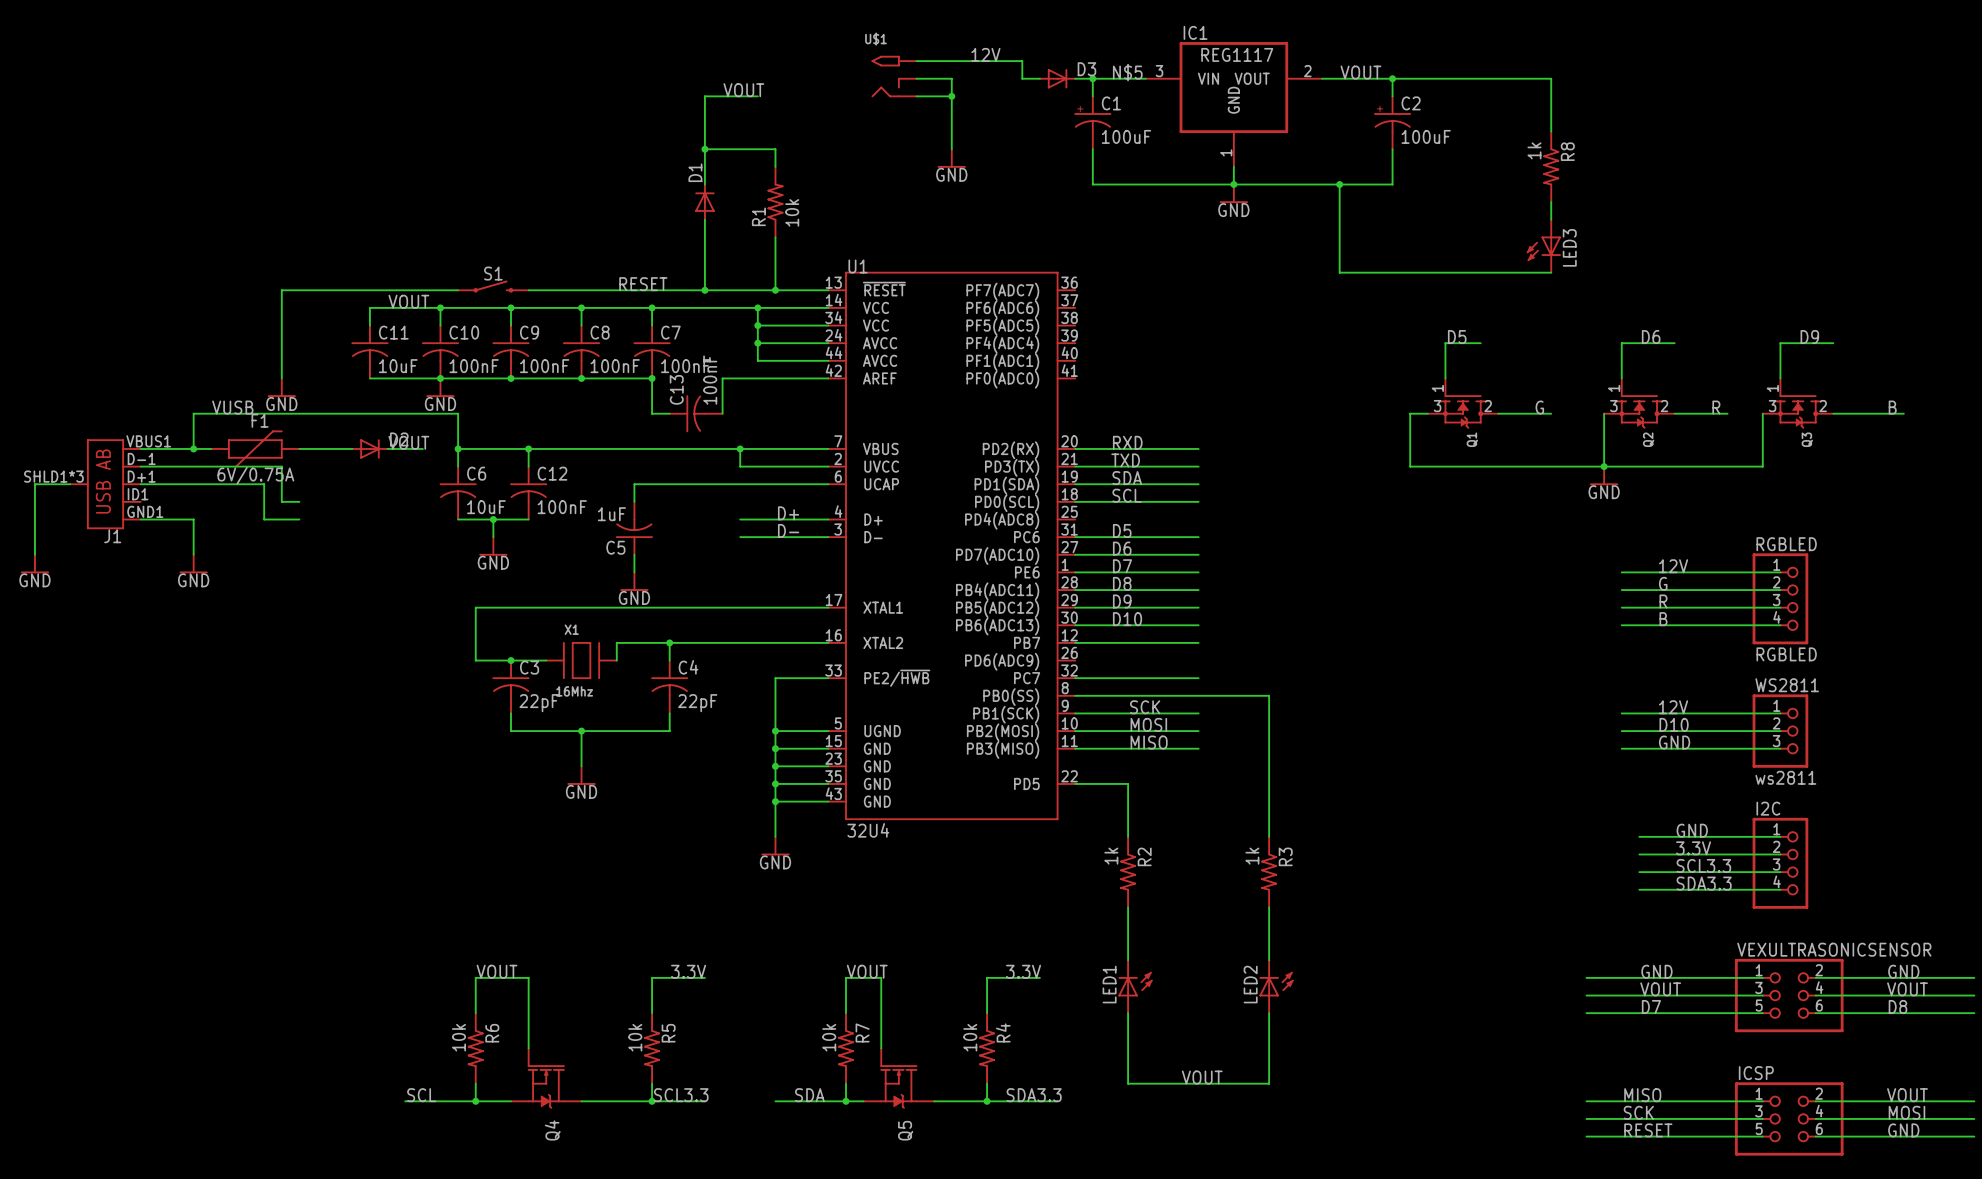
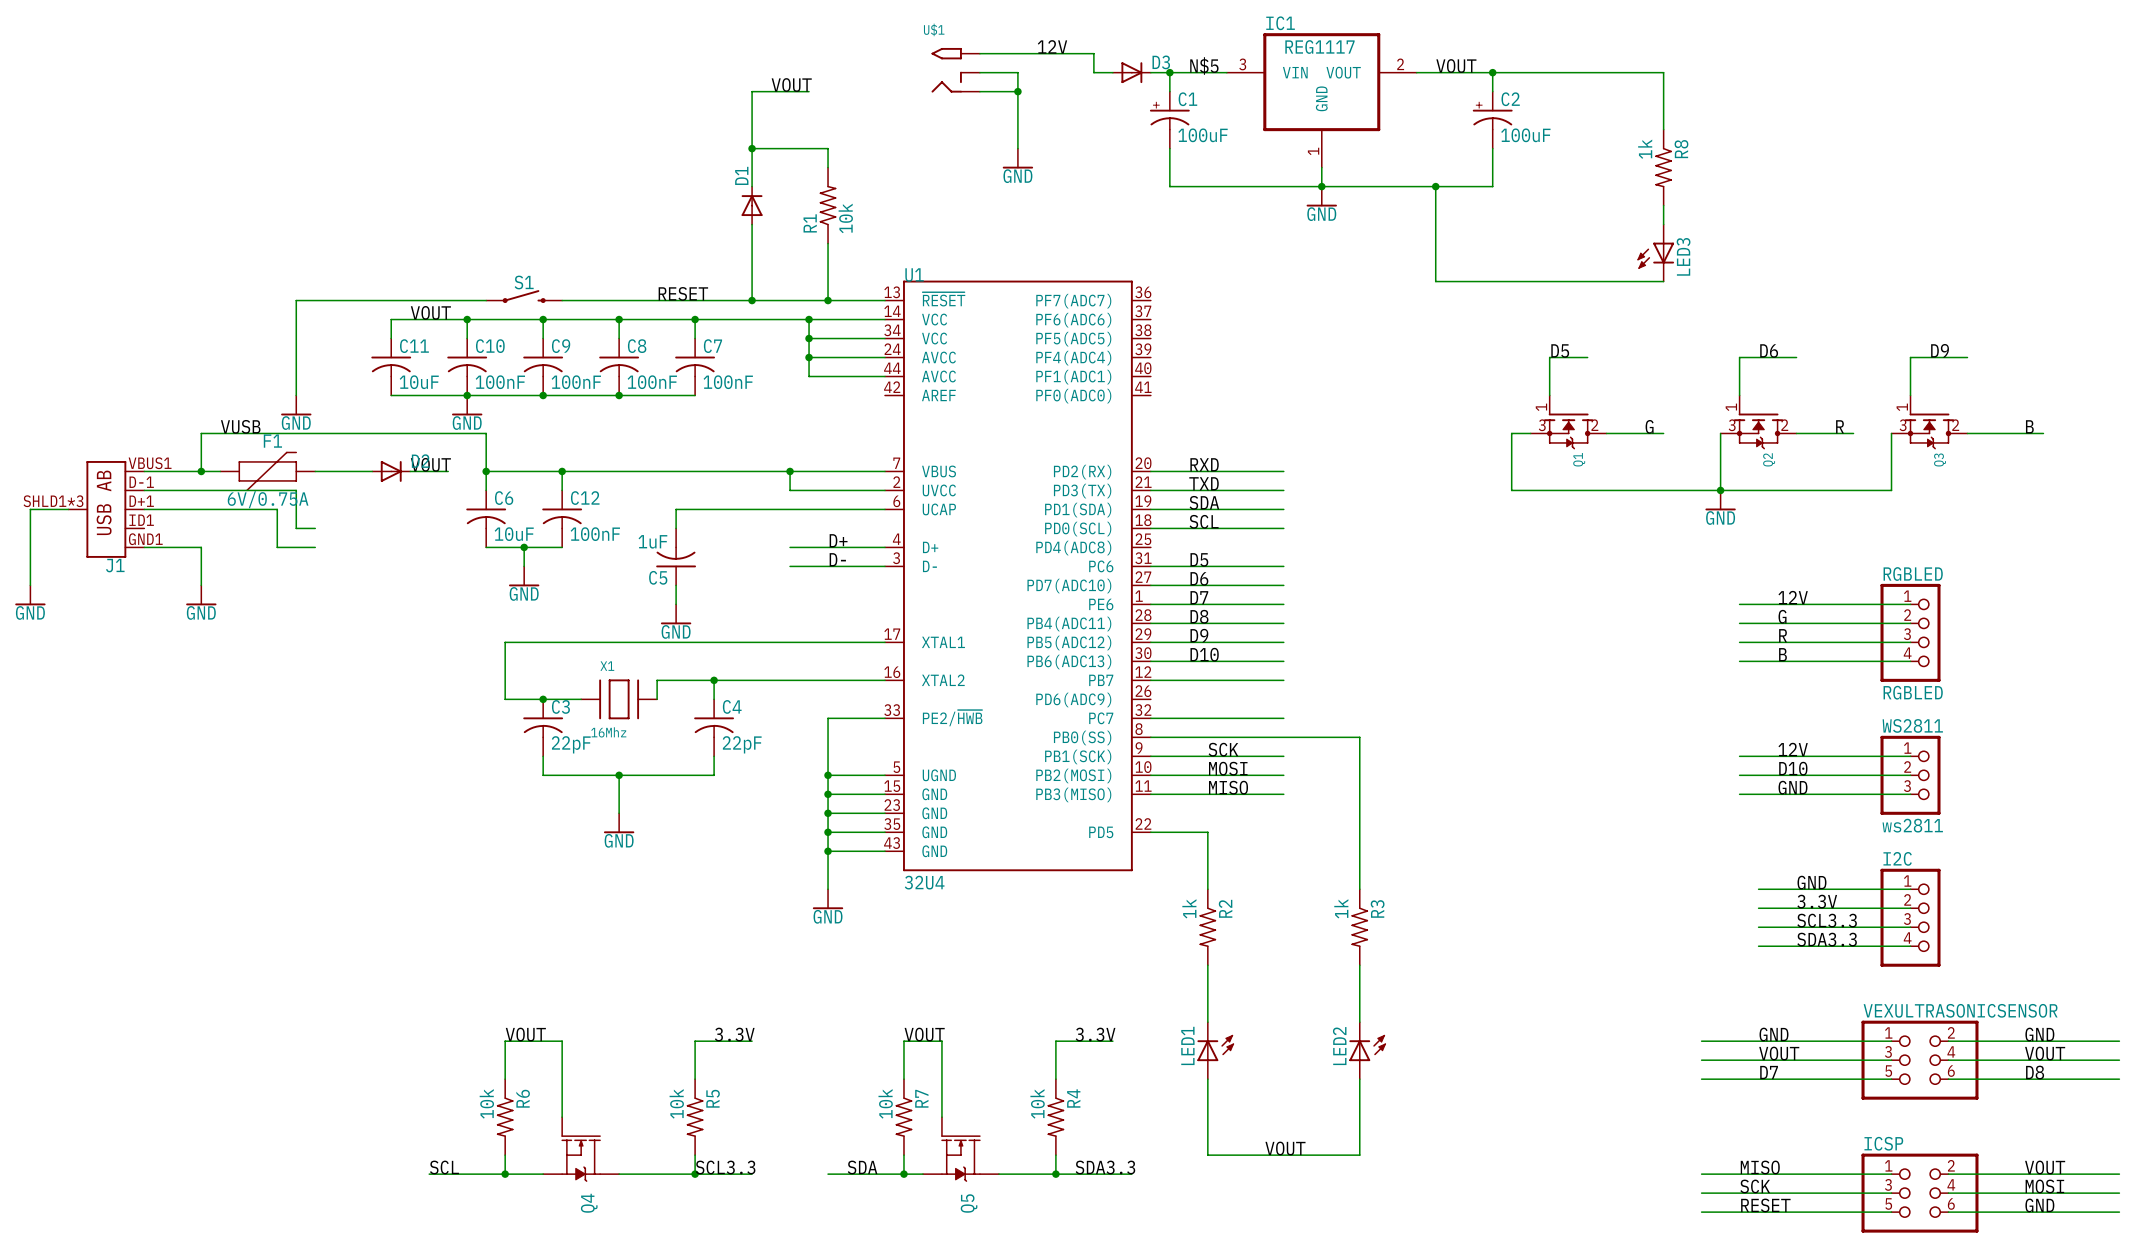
wire: (652, 378) (652, 413) (669, 413) -> none
junction: (652, 378) -> none
wire: (828, 378) (722, 378) (722, 413) -> none
C13: 100nF (696, 413) -> none

